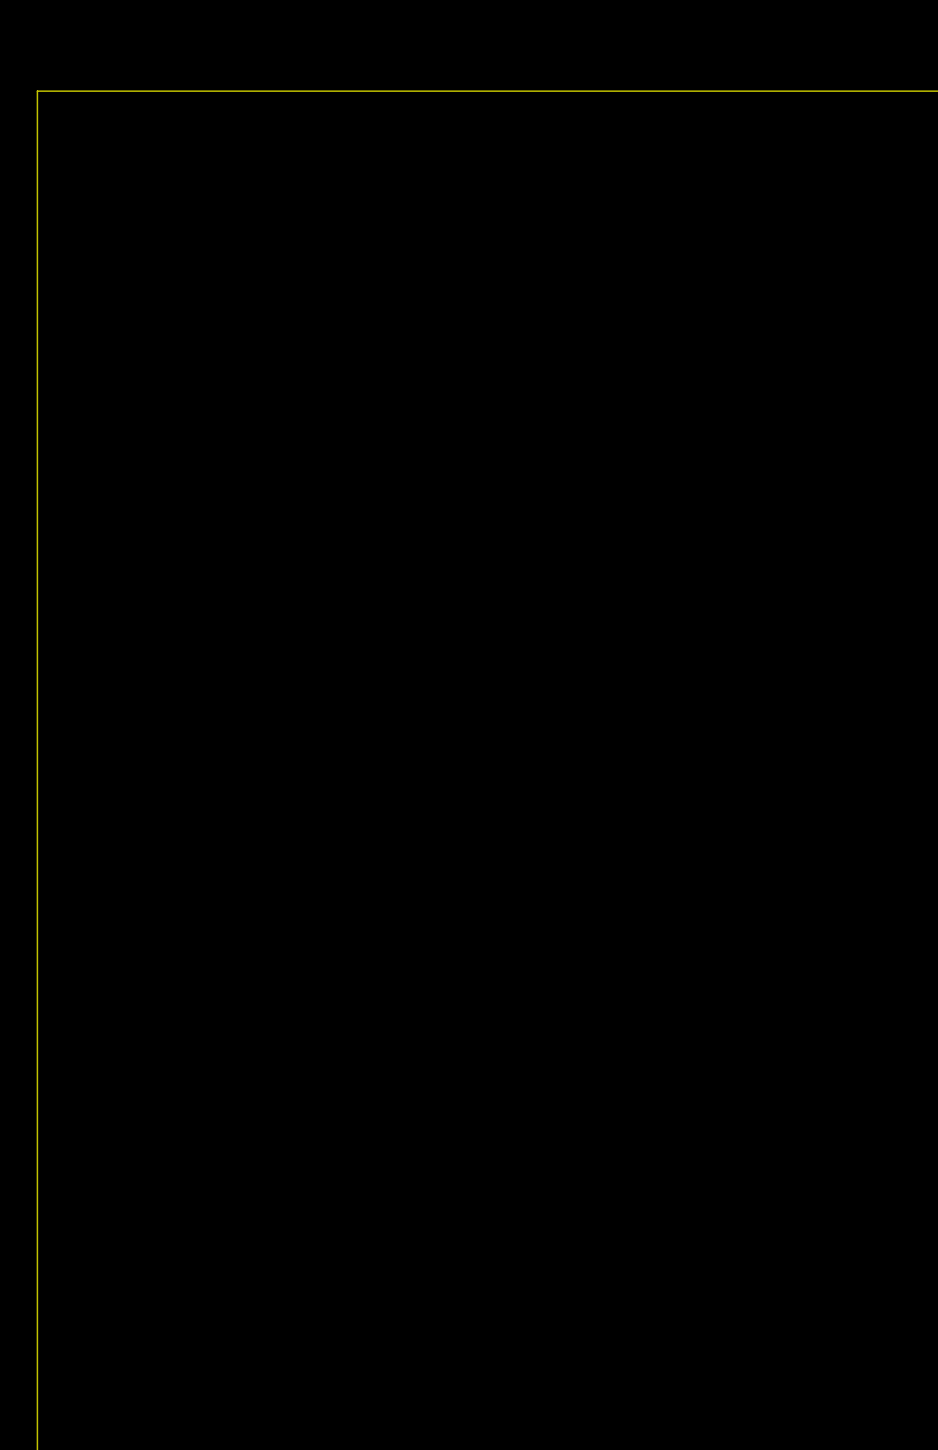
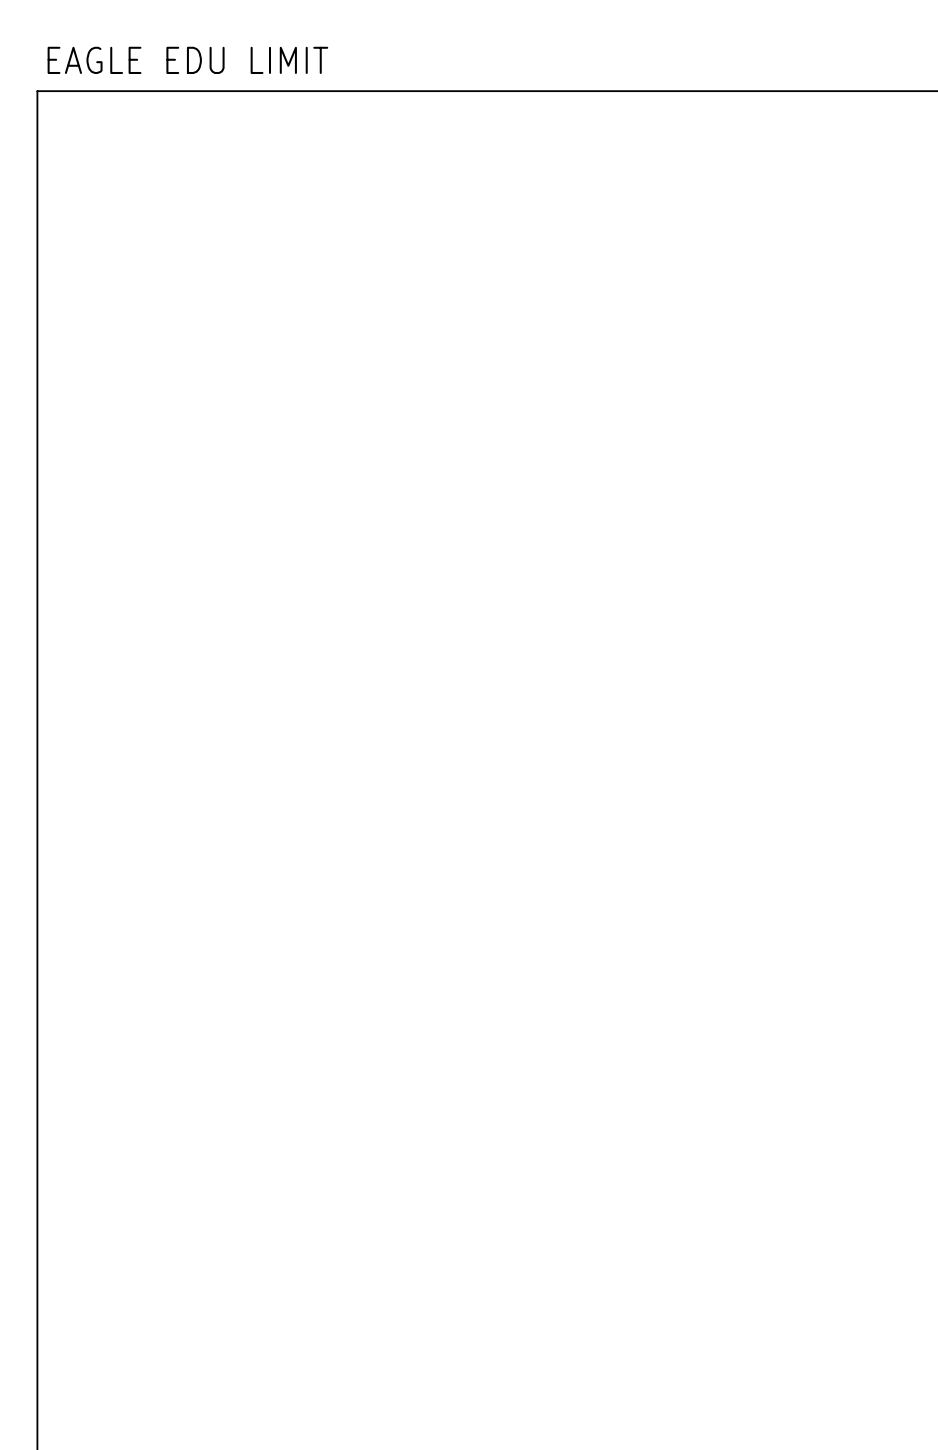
text: none -> EAGLE EDU LIMIT (187, 60)

